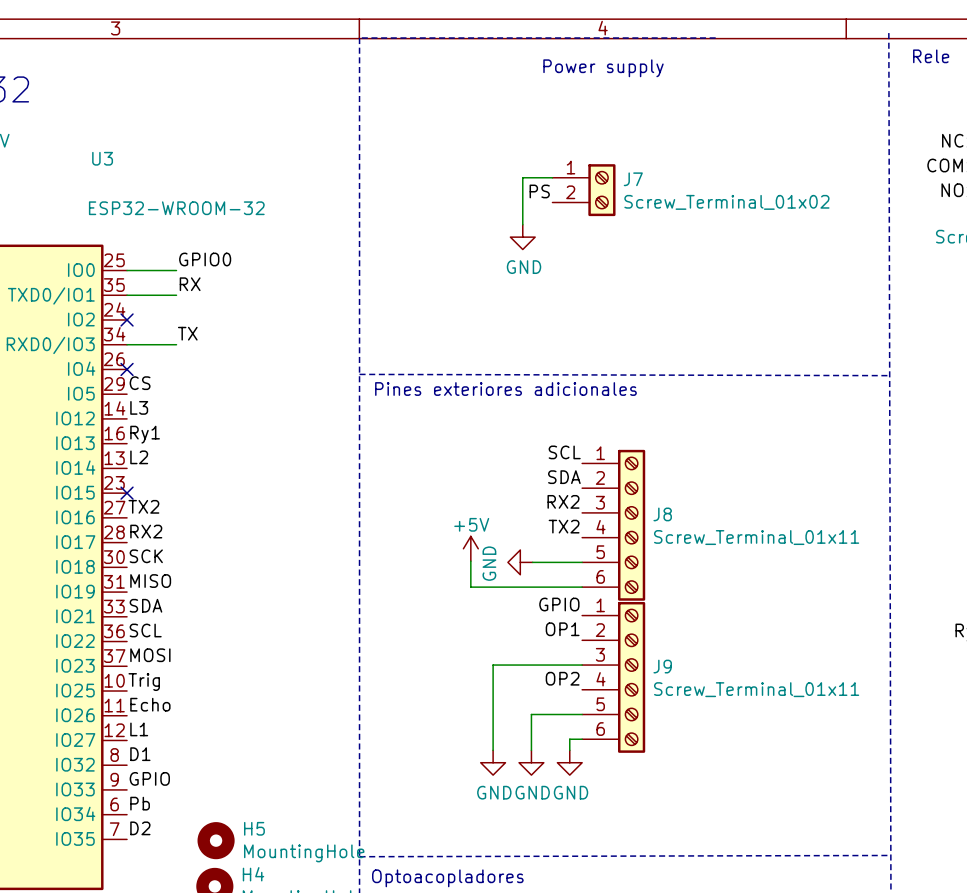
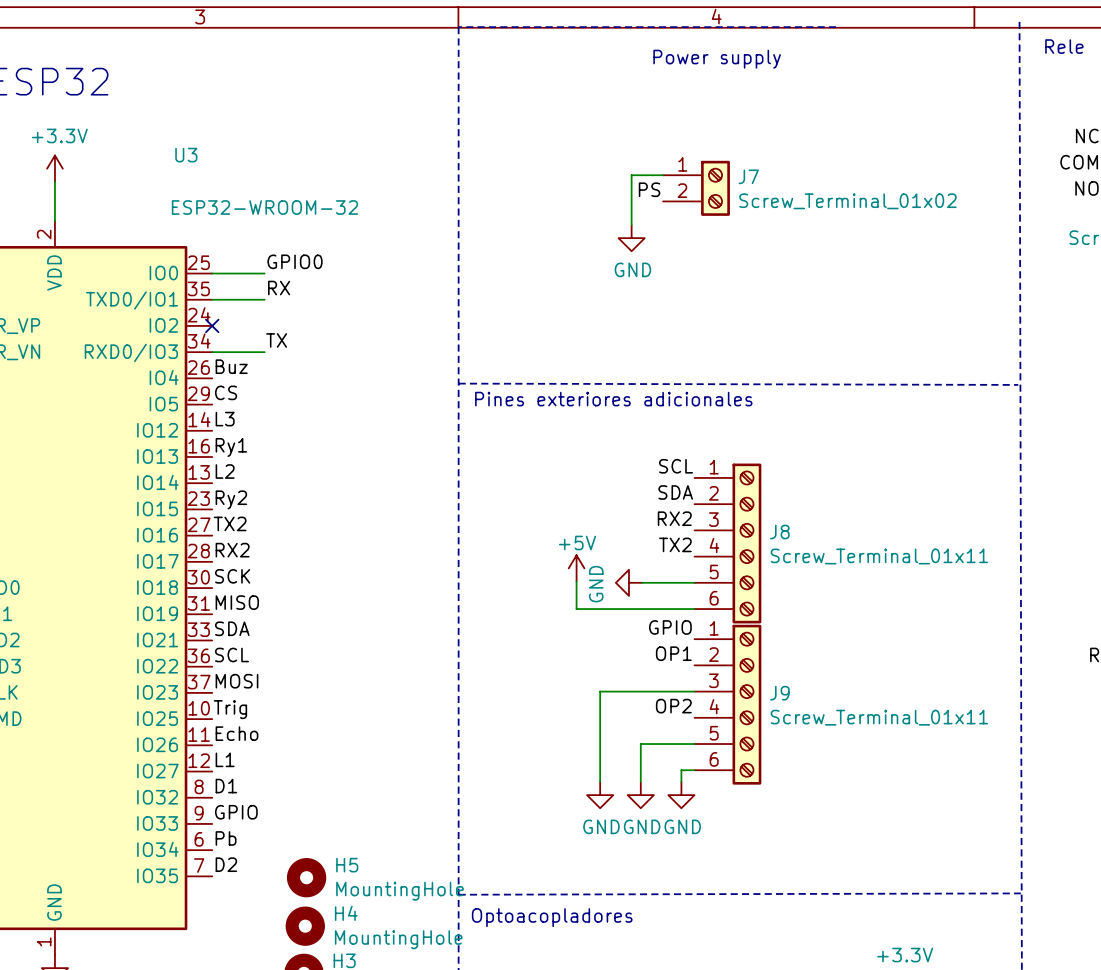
label: none -> Buz (231, 366)
no-connect mark: (127, 369) -> none
label: none -> Ry2 (231, 499)
no-connect mark: (127, 493) -> none

